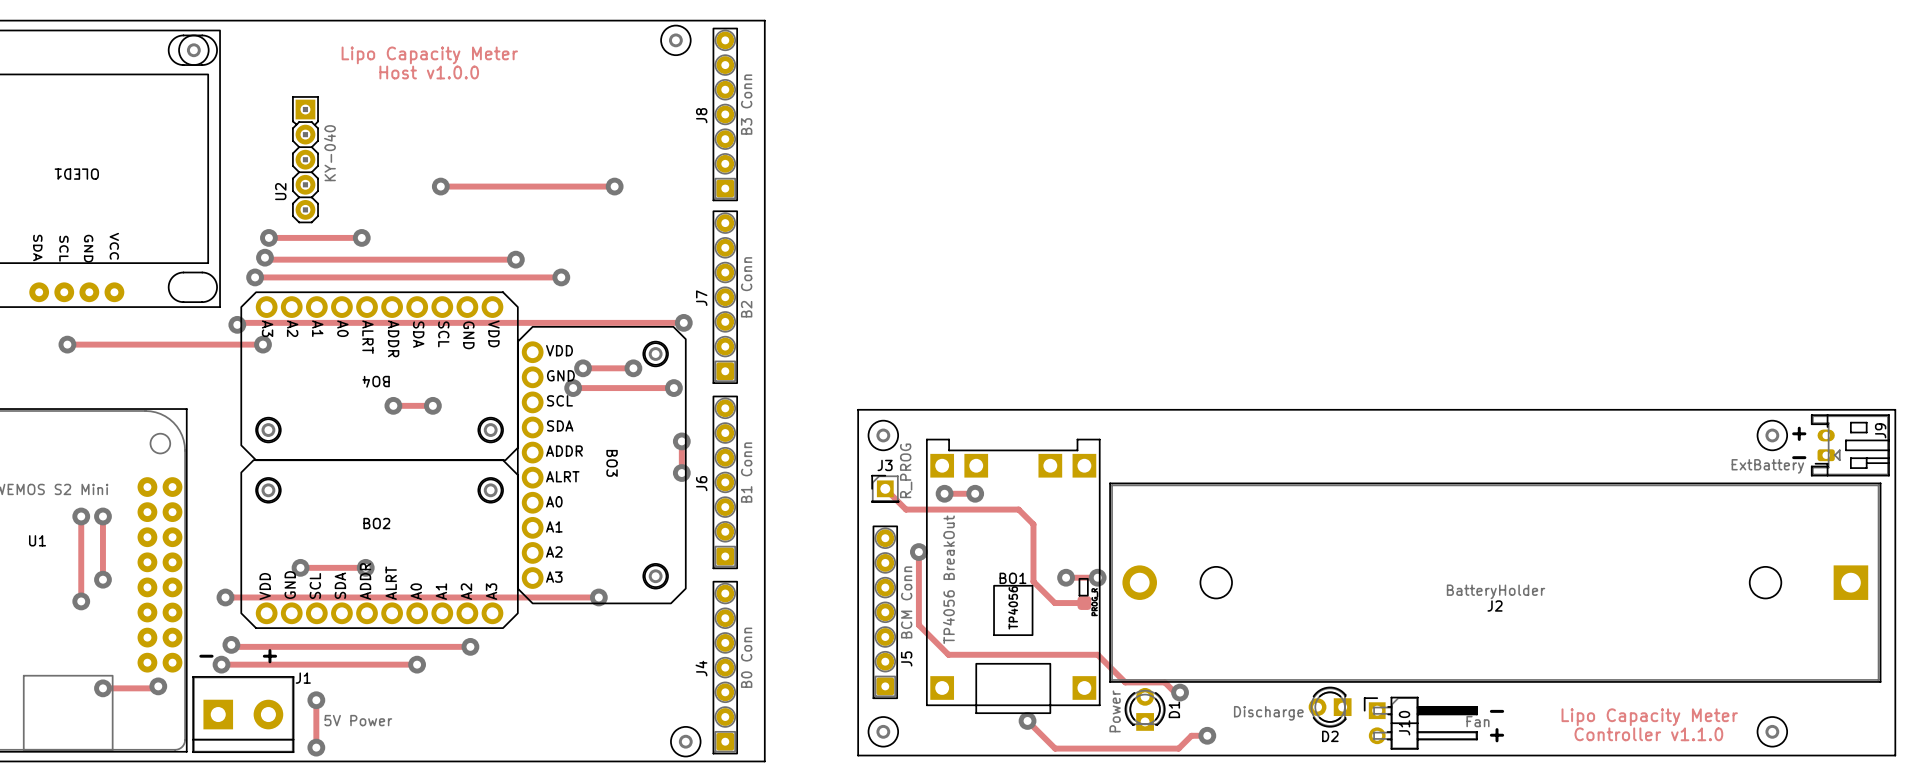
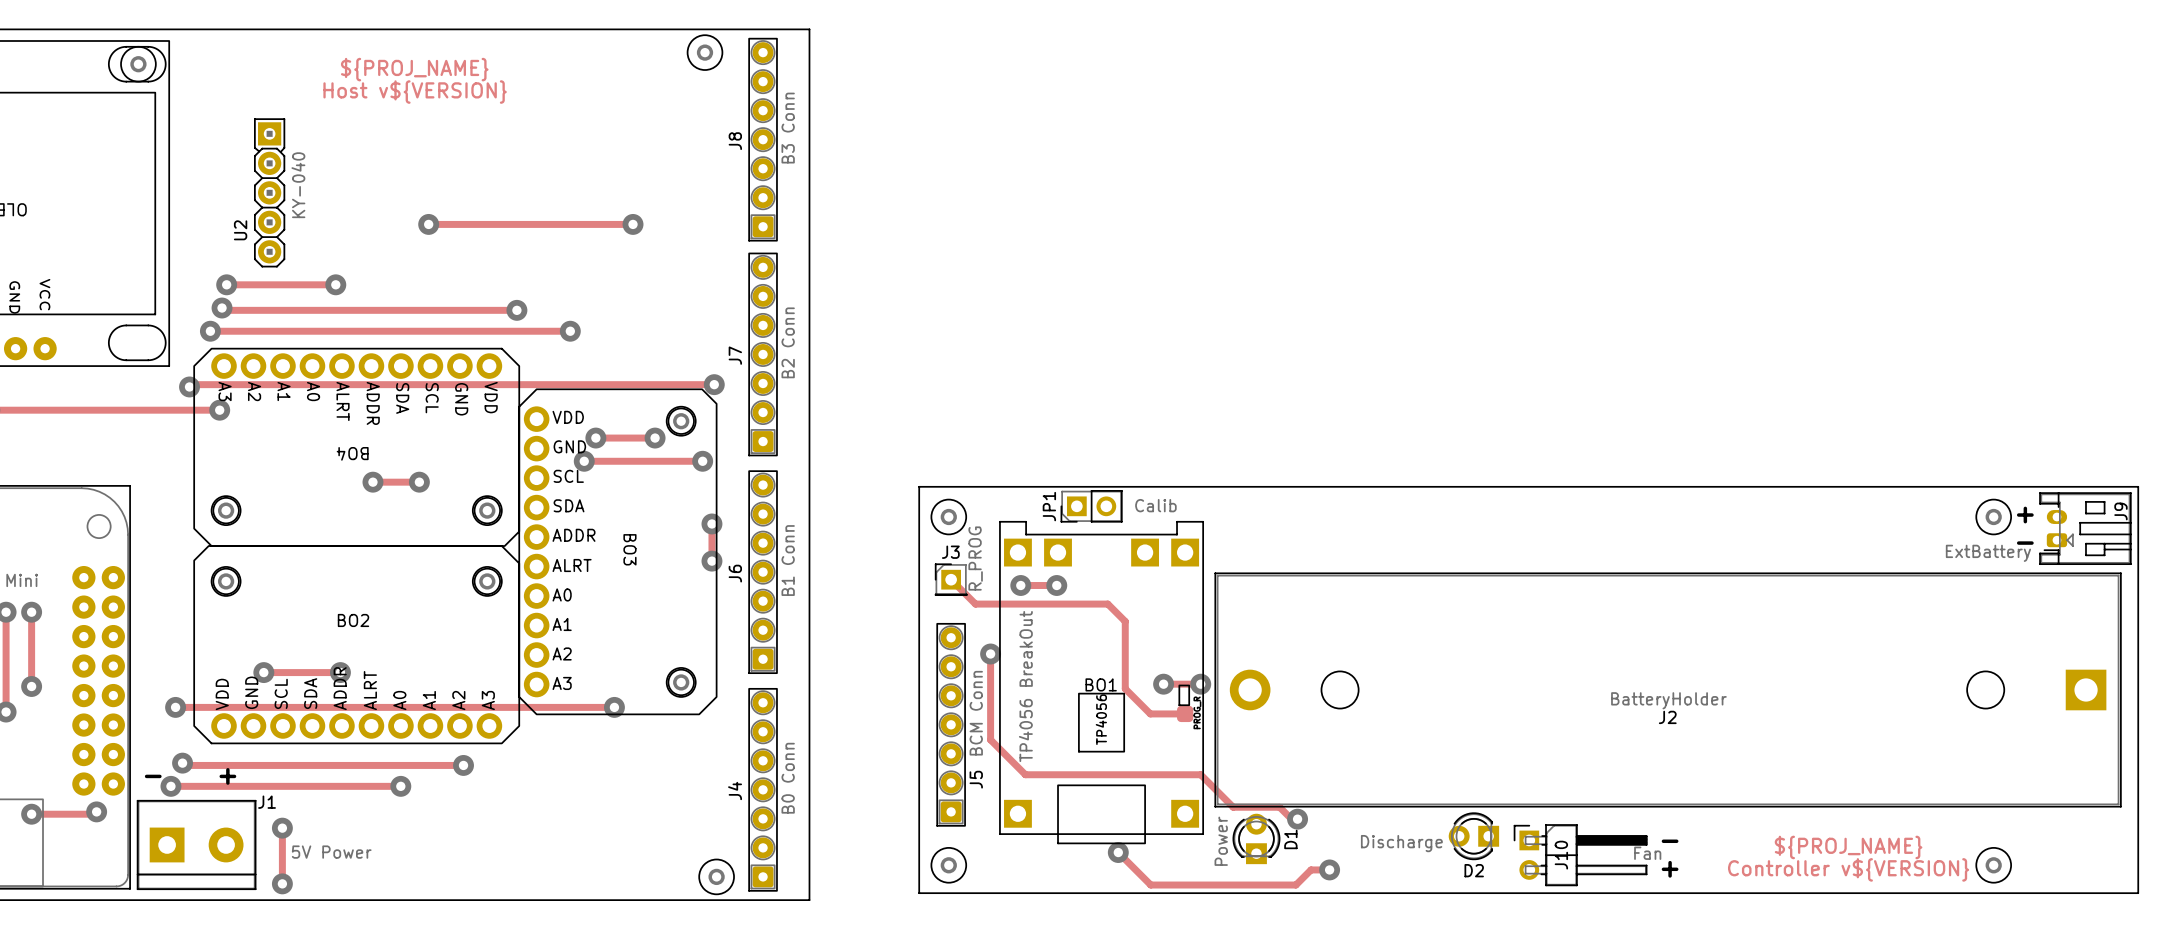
text: Lipo Capacity Meter (429, 55) -> ${PROJ_NAME} (414, 69)
text: Host v1.0.0 (429, 72) -> Host v${VERSION} (415, 92)
JP1: none -> Calib (1091, 506)
text: Lipo Capacity Meter (1649, 717) -> ${PROJ_NAME} (1848, 847)
text: Controller v1.1.0 (1648, 734) -> Controller v${VERSION} (1848, 869)

